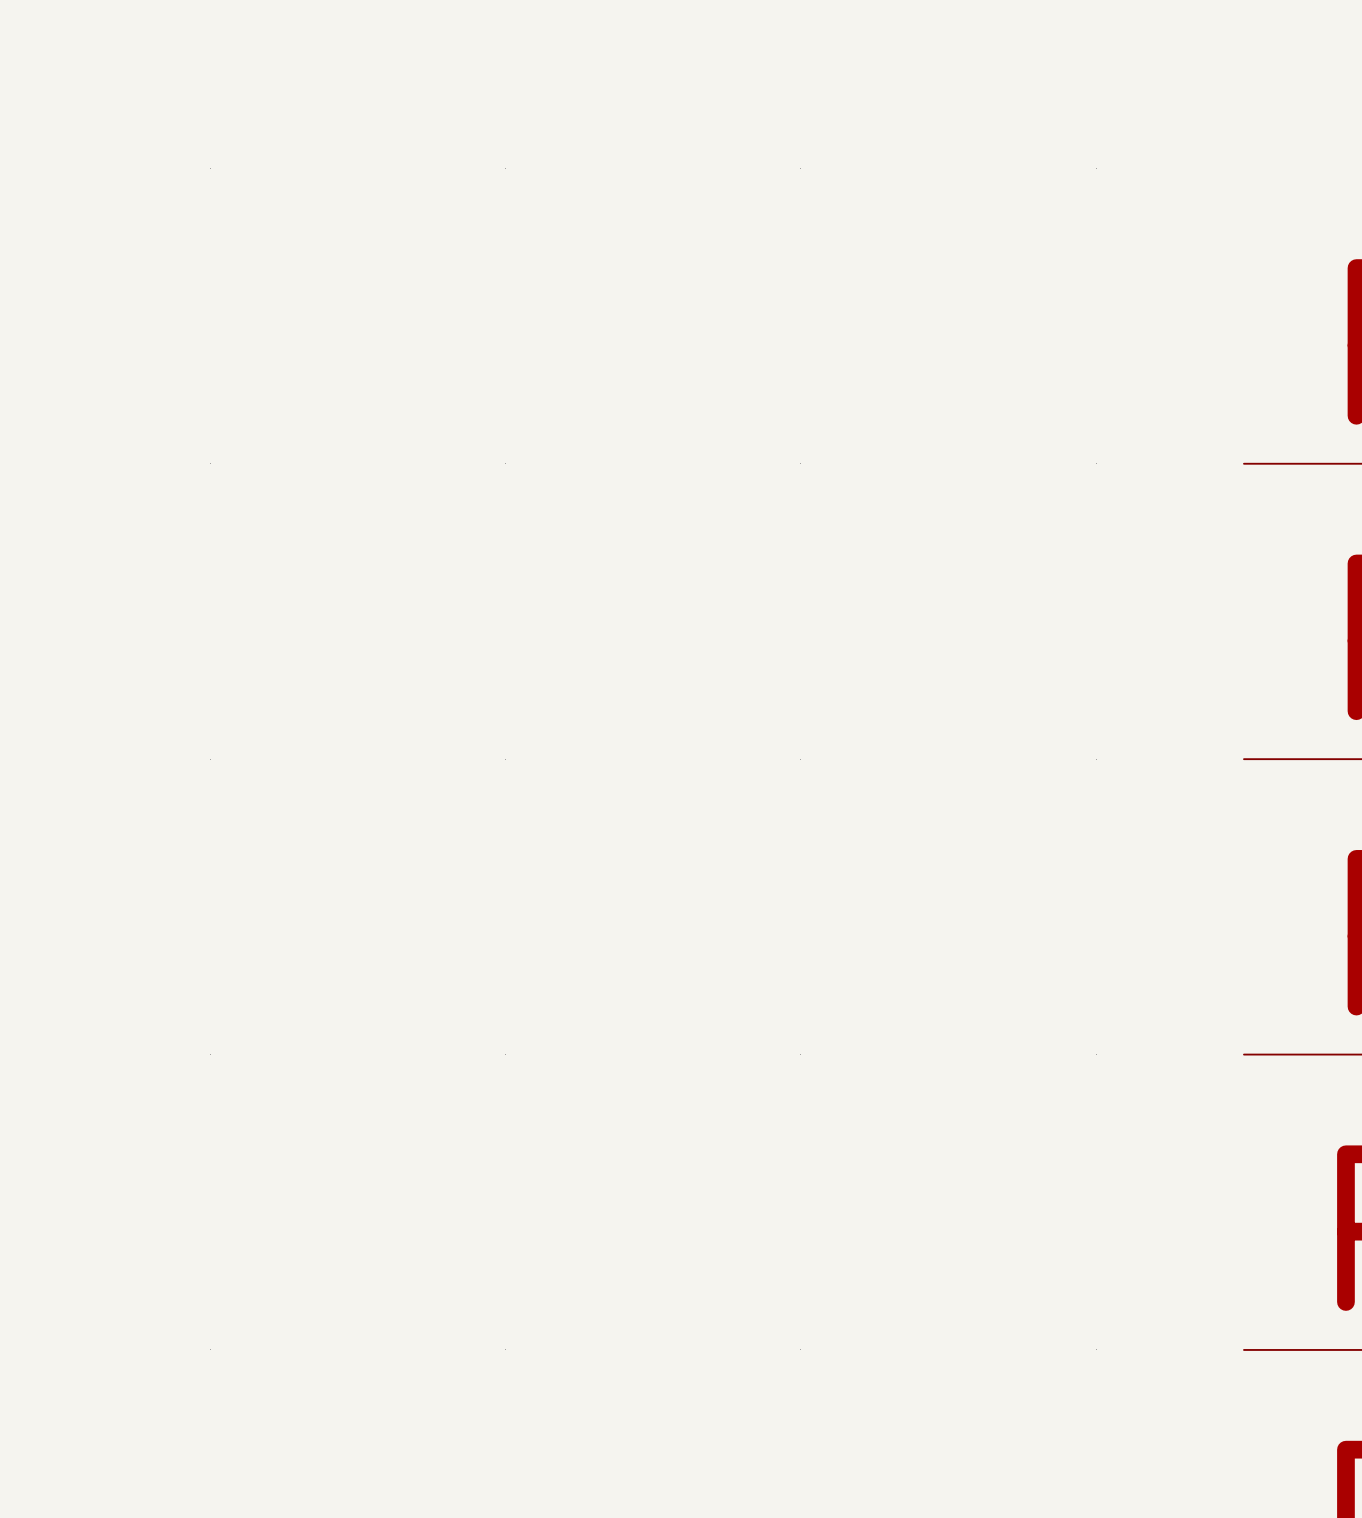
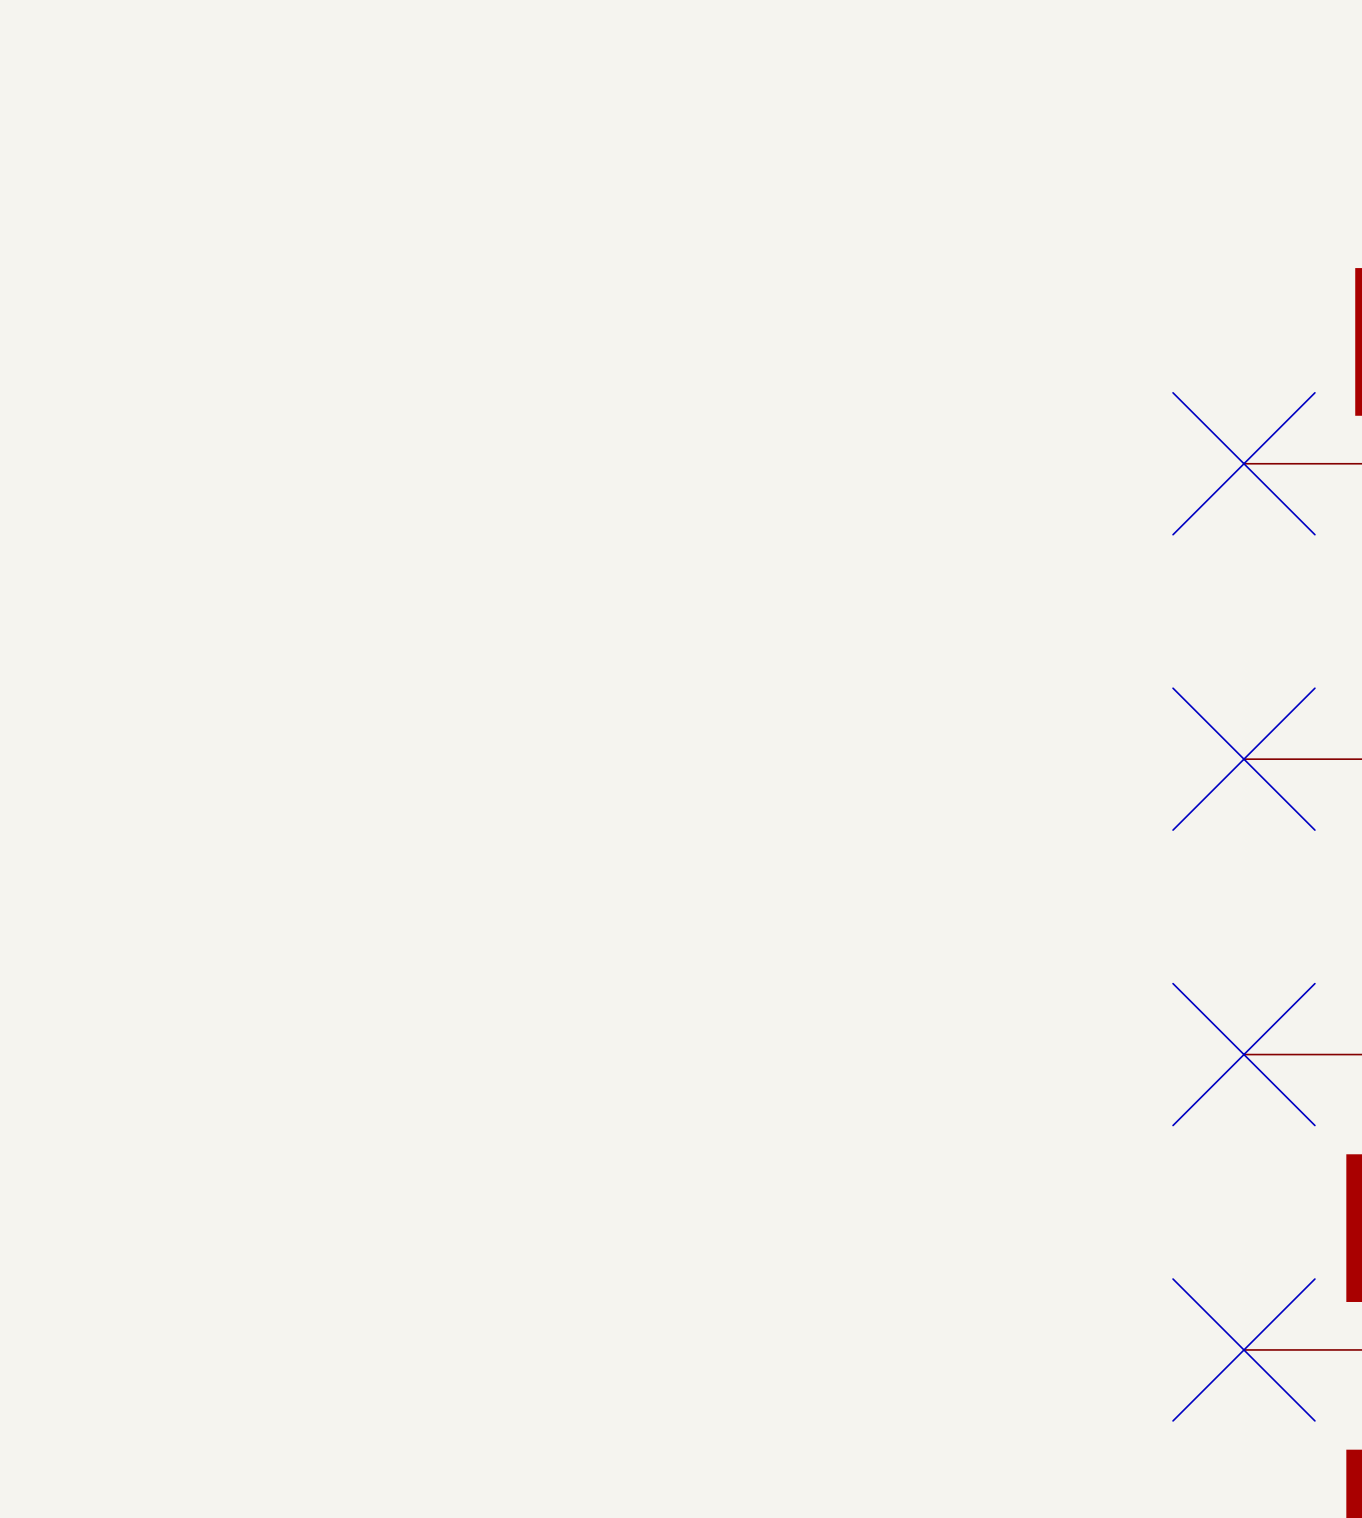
no-connect mark: none -> (1243, 463)
no-connect mark: none -> (1243, 759)
no-connect mark: none -> (1243, 1054)
no-connect mark: none -> (1243, 1349)

